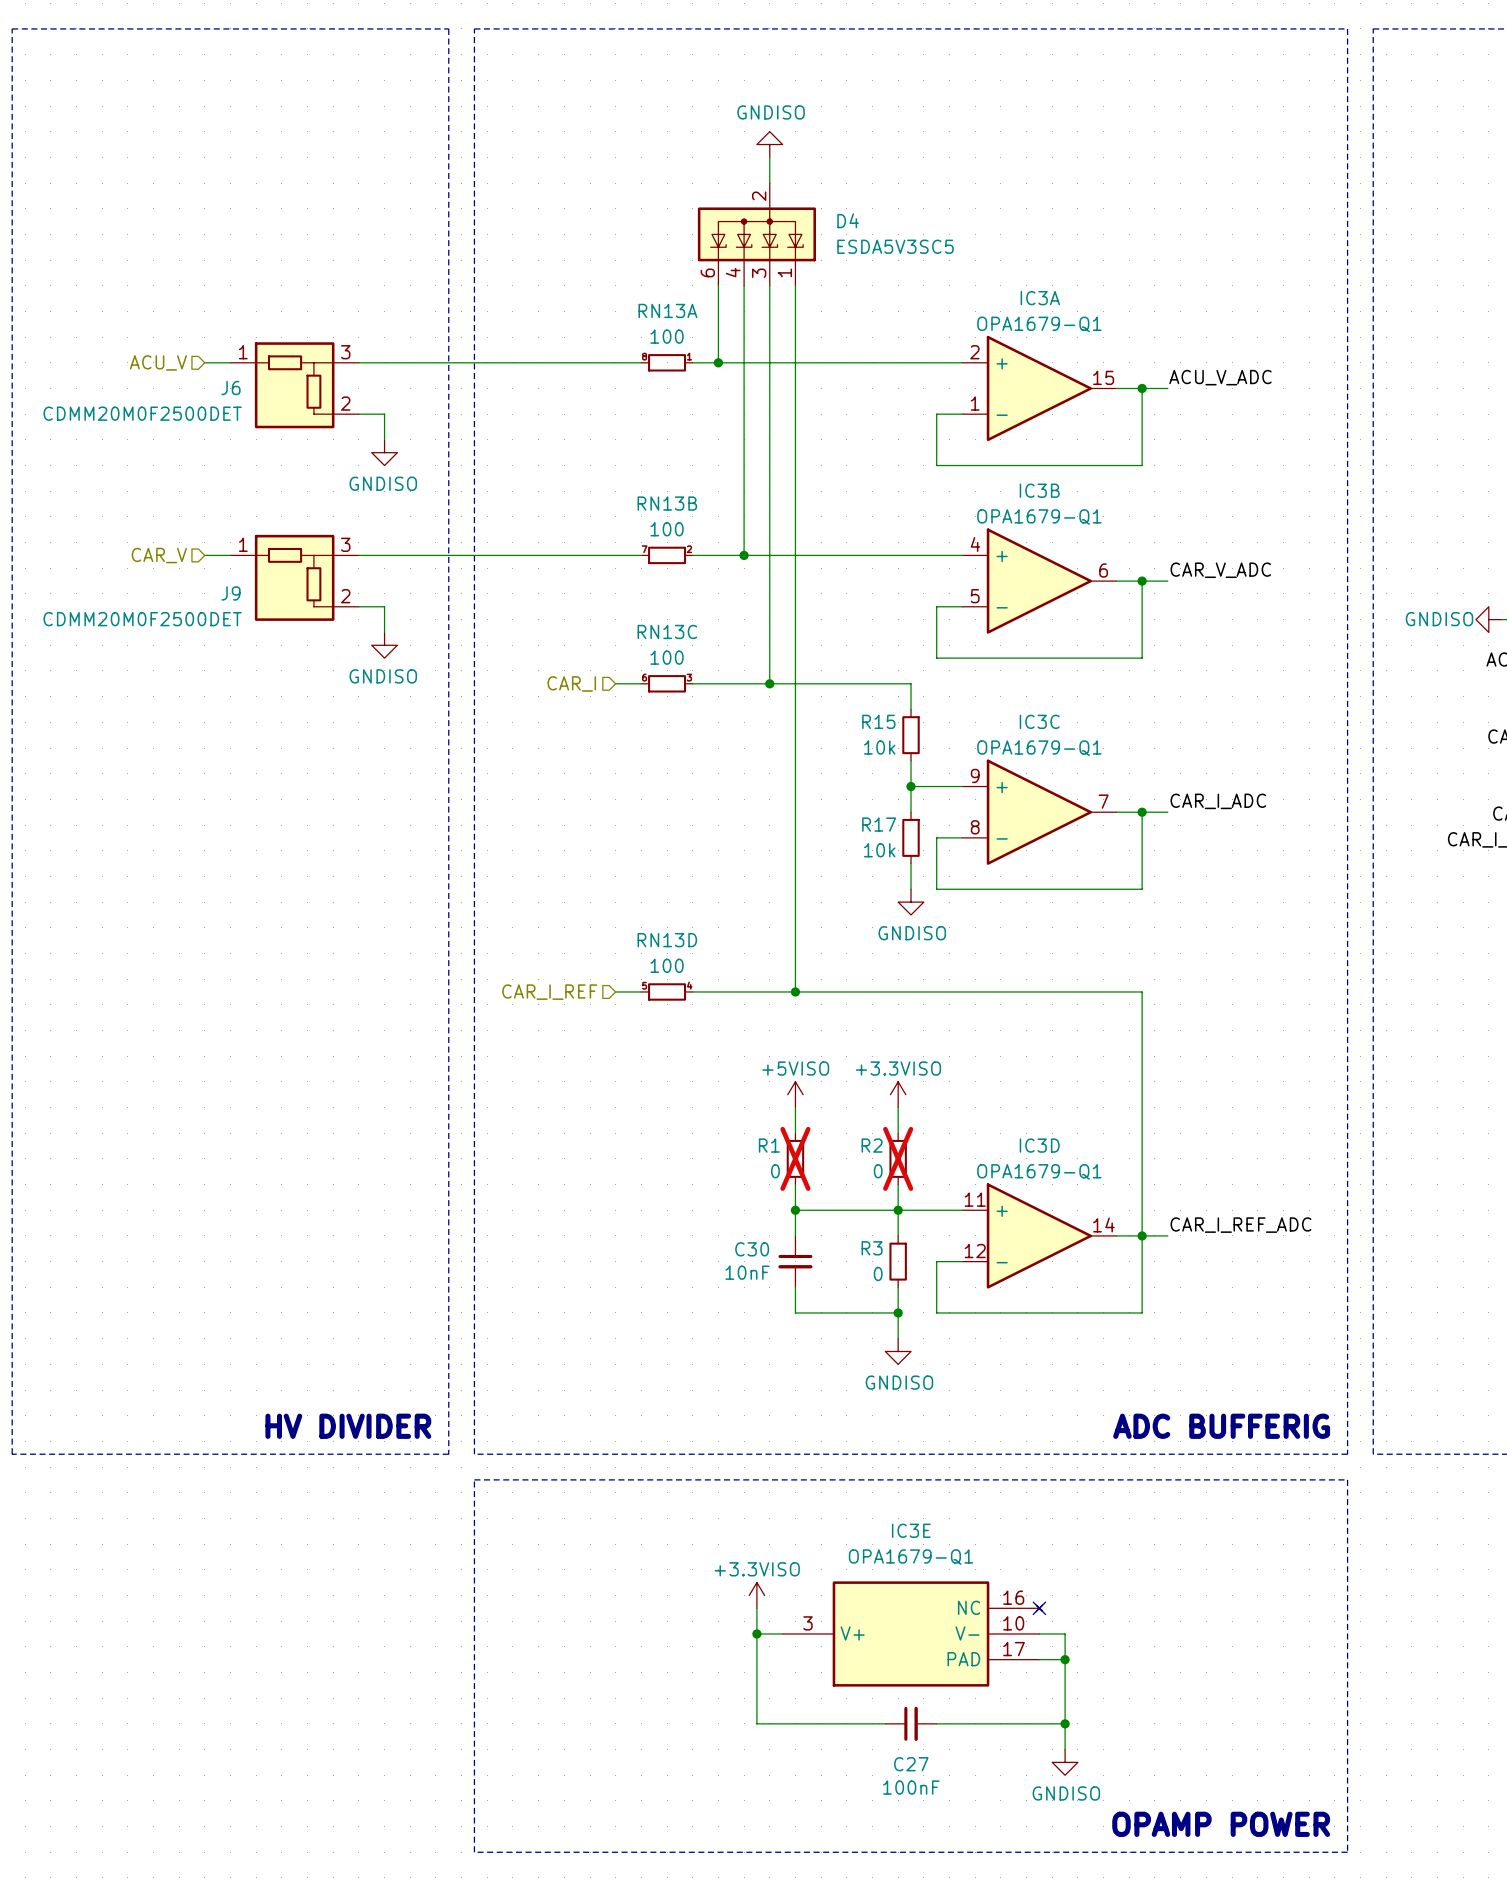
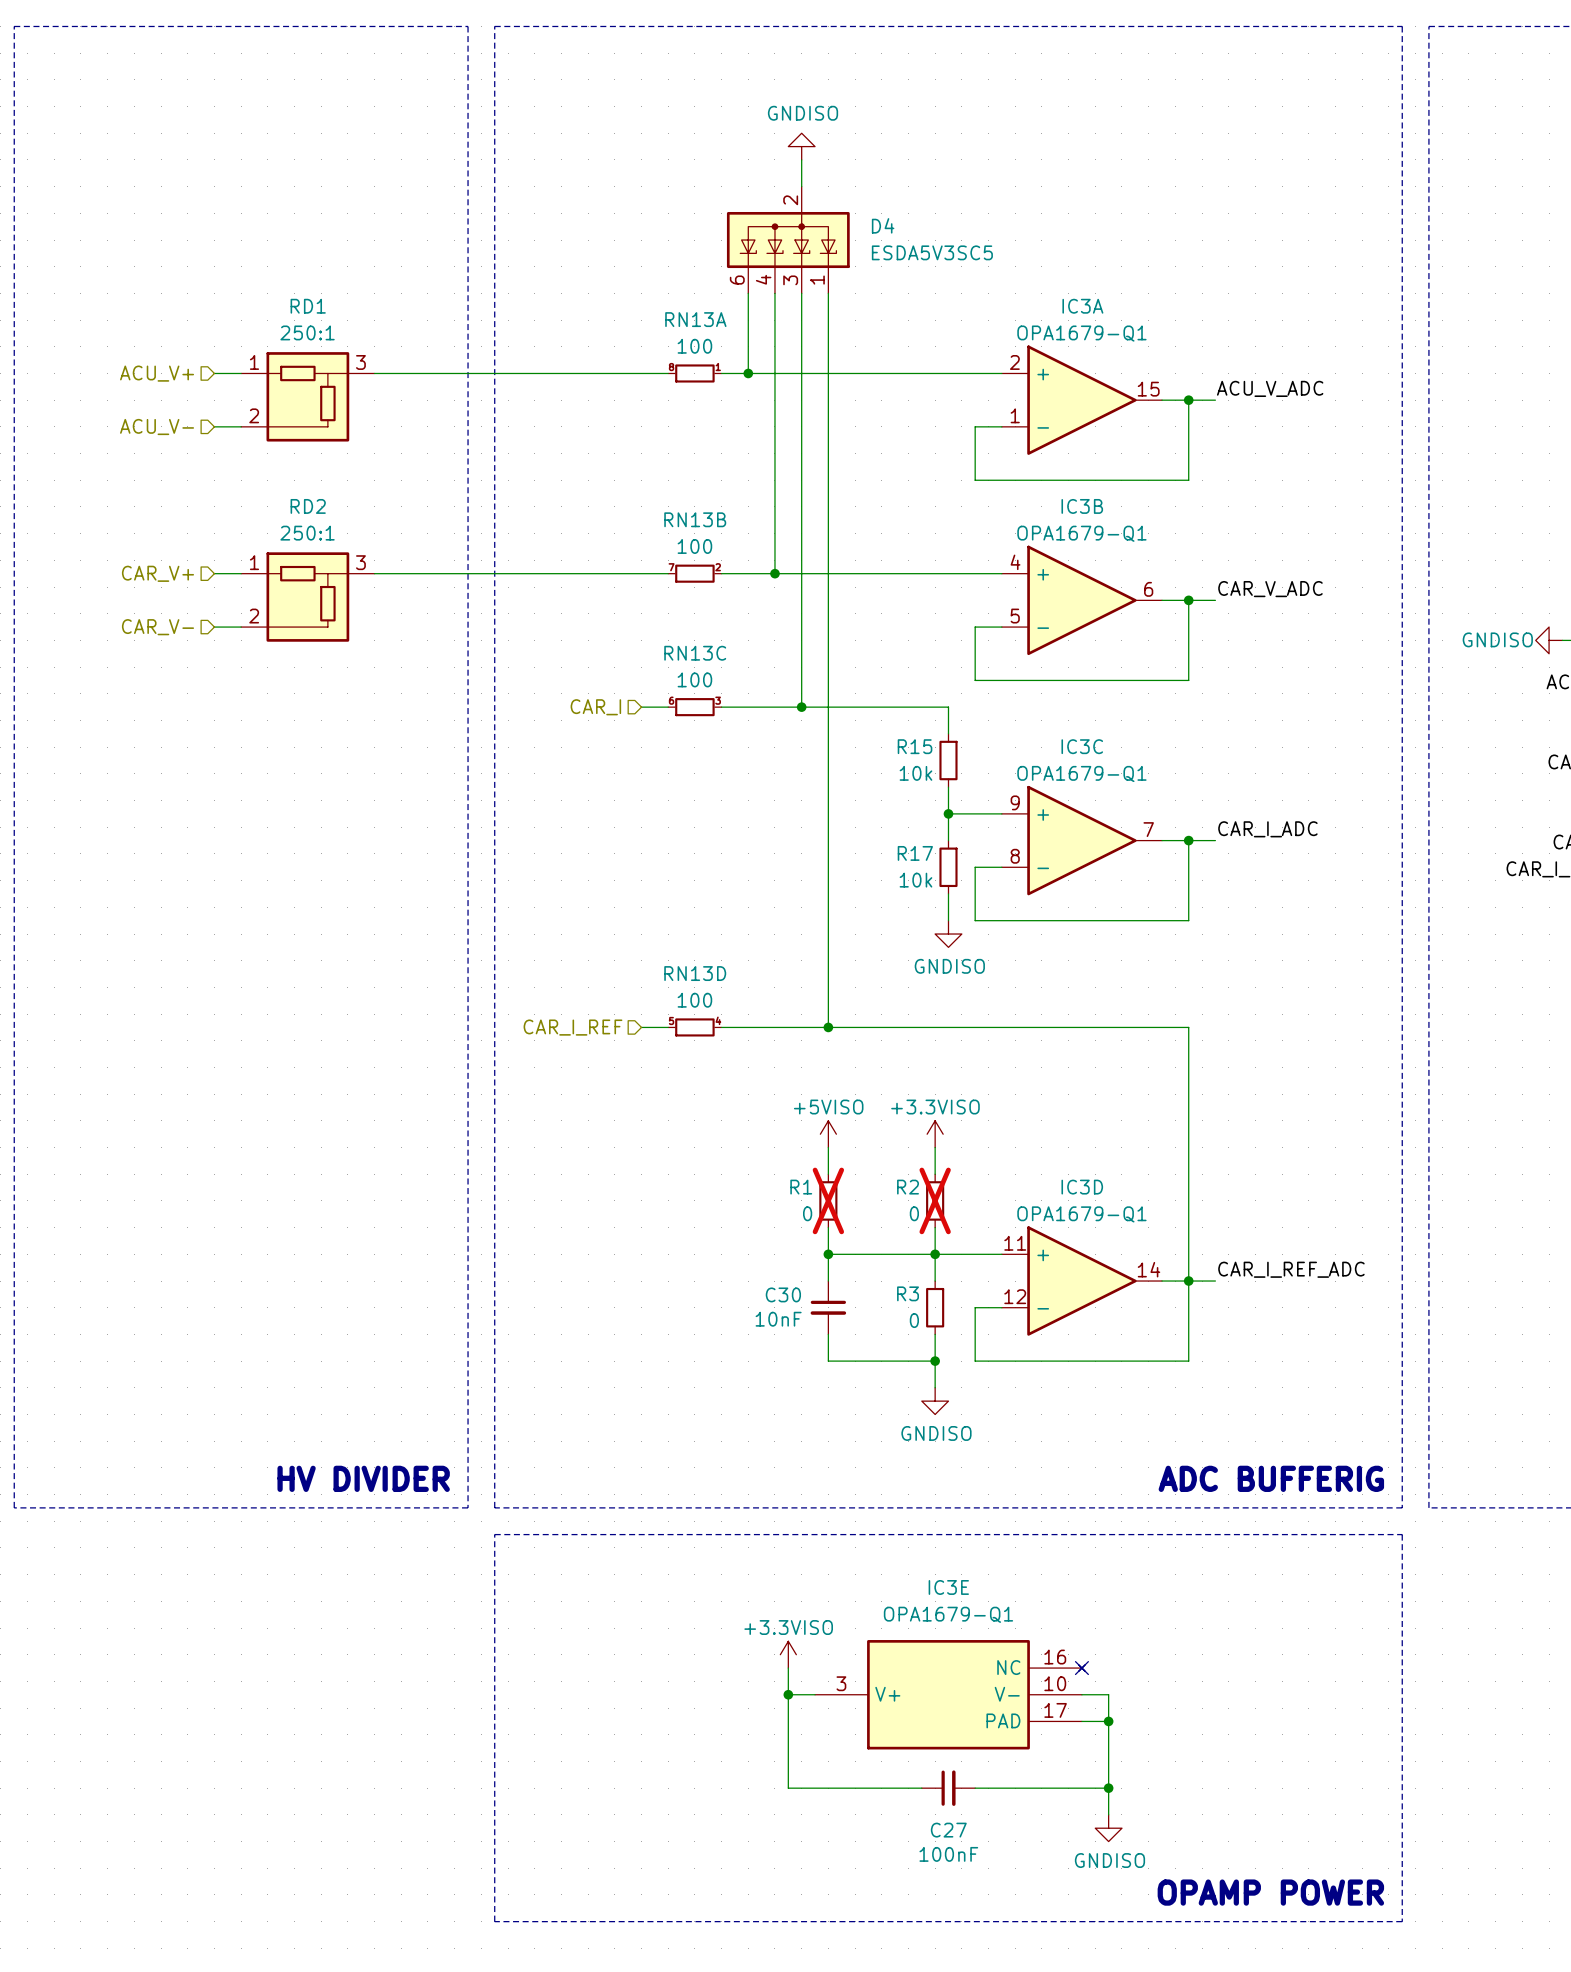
hierarchical label: ACU_V (158, 362) -> ACU_V+ (157, 373)
J6: CDMM20M0F2500DET (294, 385) -> none
RD1: none -> 250:1 (307, 396)
hierarchical label: none -> ACU_V- (157, 427)
wire: none -> (214, 426) (241, 426)
wire: (358, 414) (384, 414) (384, 439) -> none
power symbol: GNDISO (384, 452) -> none
hierarchical label: CAR_V (159, 555) -> CAR_V+ (157, 573)
J9: CDMM20M0F2500DET (294, 577) -> none
RD2: none -> 250:1 (307, 597)
hierarchical label: none -> CAR_V- (157, 627)
wire: none -> (214, 627) (241, 627)
wire: (358, 606) (384, 606) (384, 632) -> none
power symbol: GNDISO (384, 645) -> none

